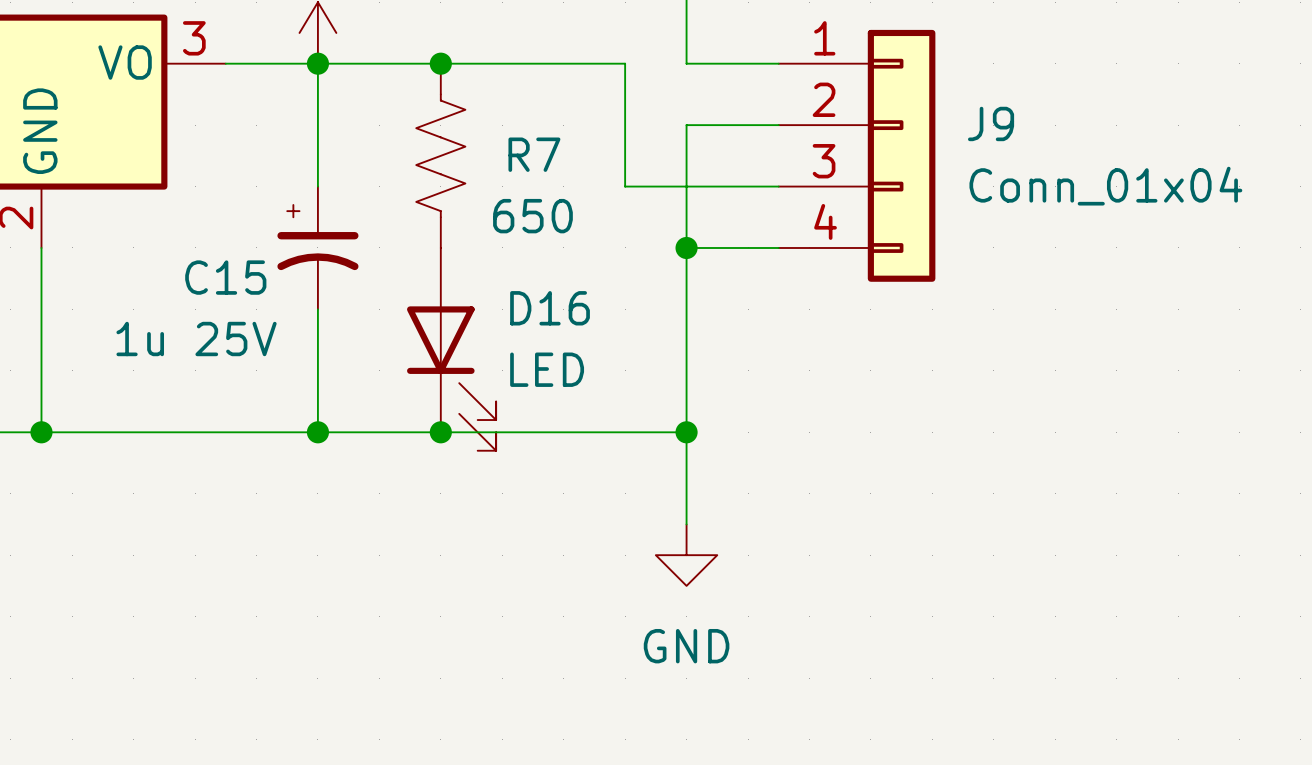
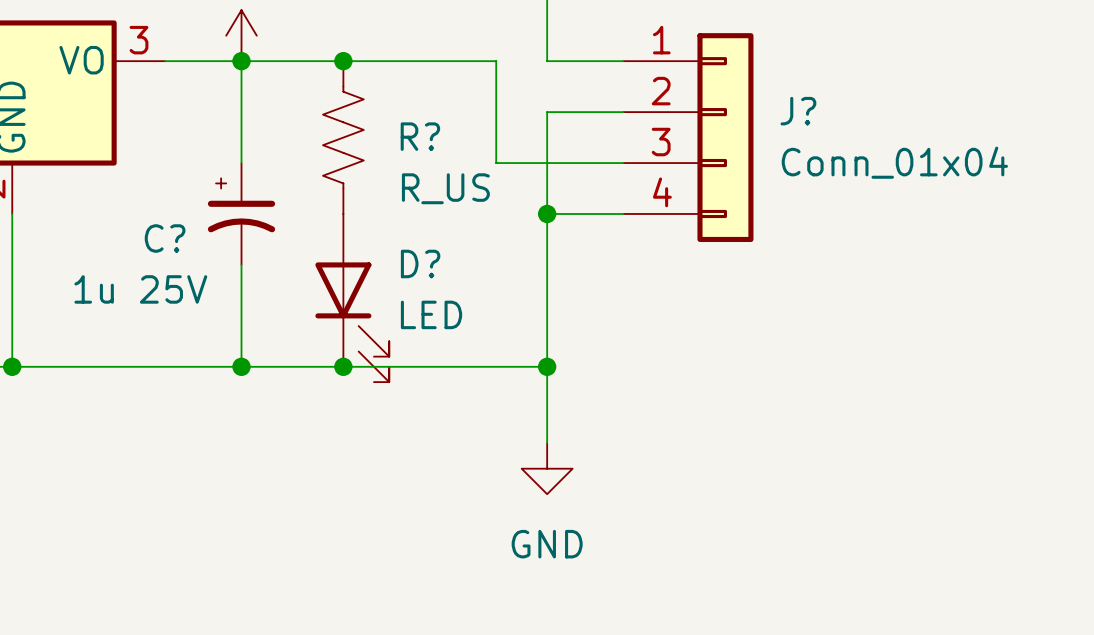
J9 name: J9 (991, 123) -> J? (798, 111)
R7 name: R7 (534, 154) -> R? (420, 136)
R7 value: 650 (532, 216) -> R_US (445, 188)
C15 name: C15 (225, 277) -> C? (165, 238)
D16 name: D16 (550, 308) -> D? (420, 263)

